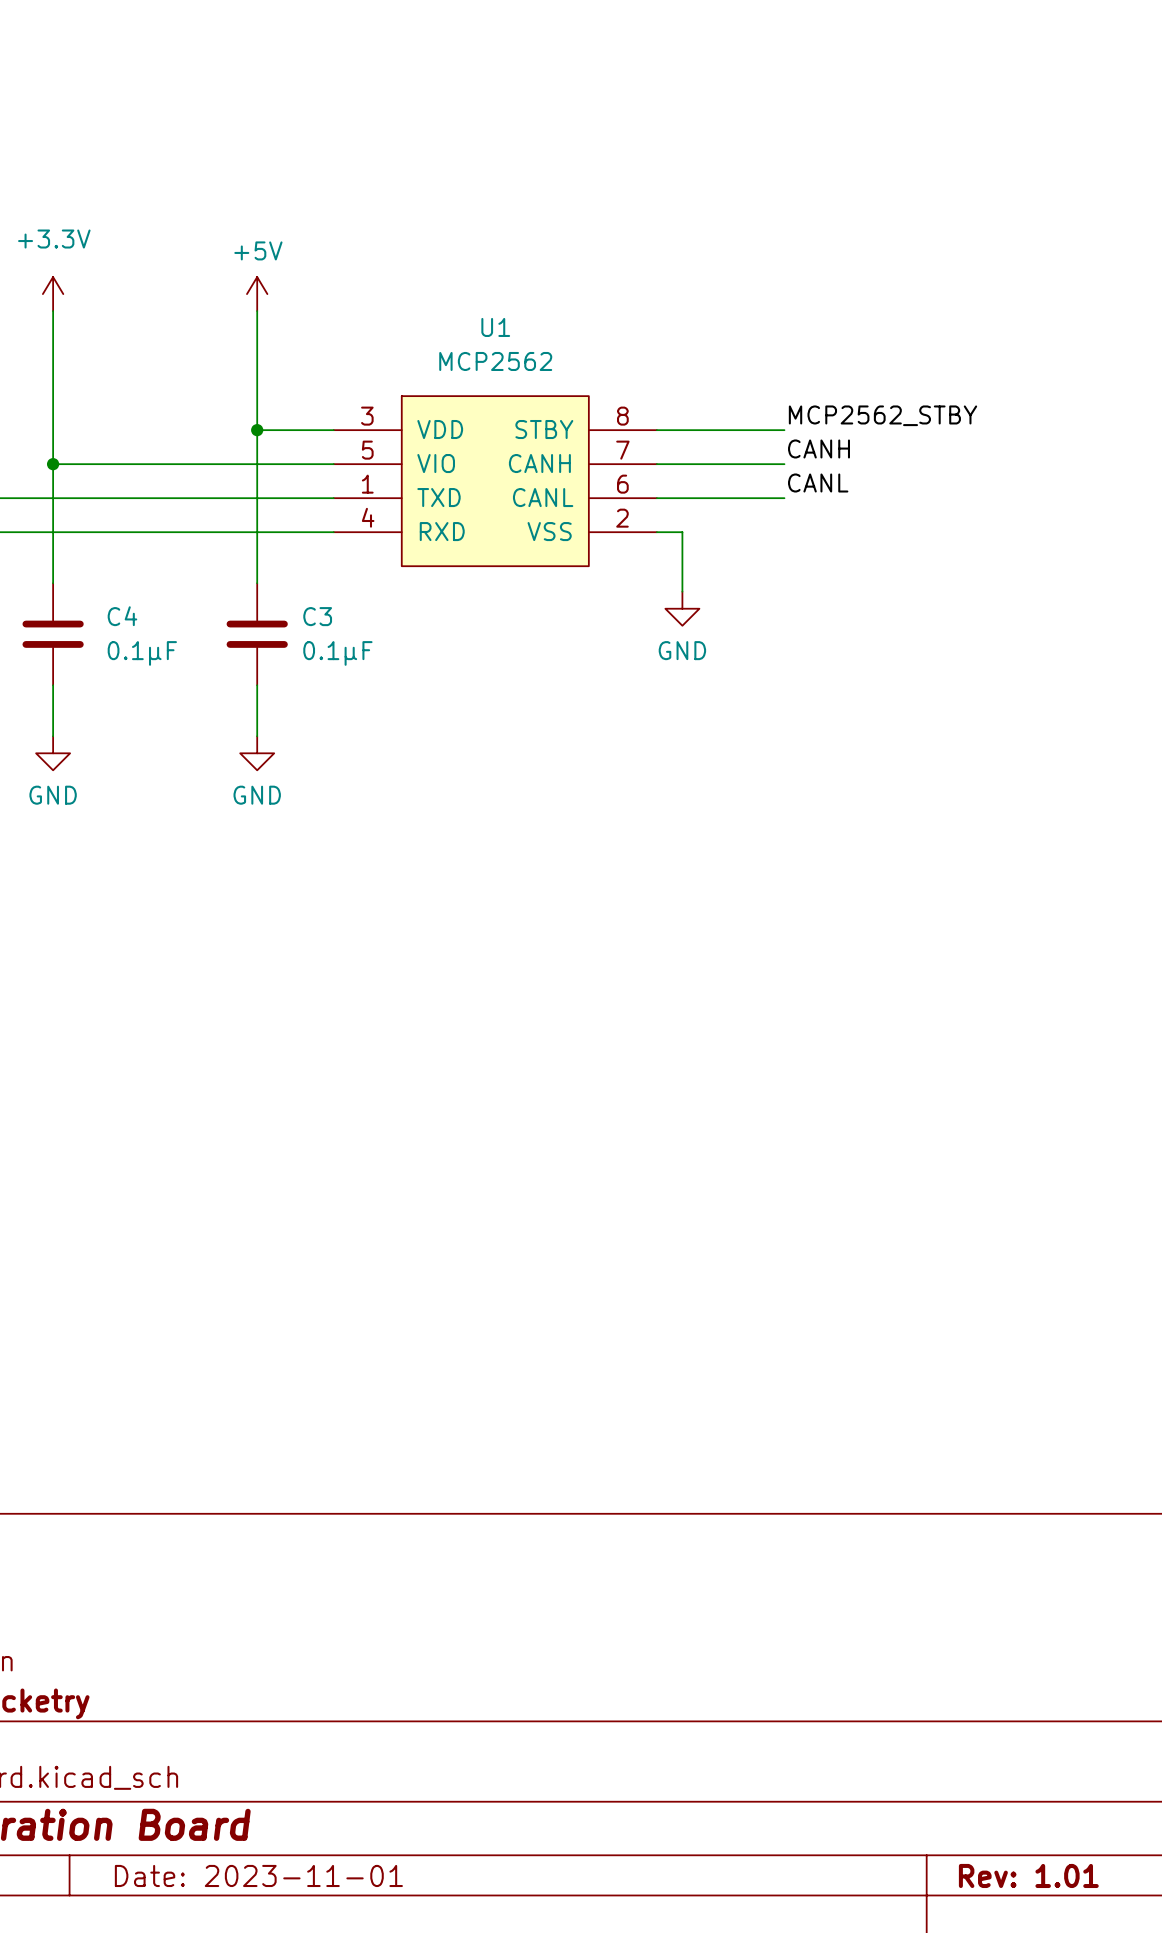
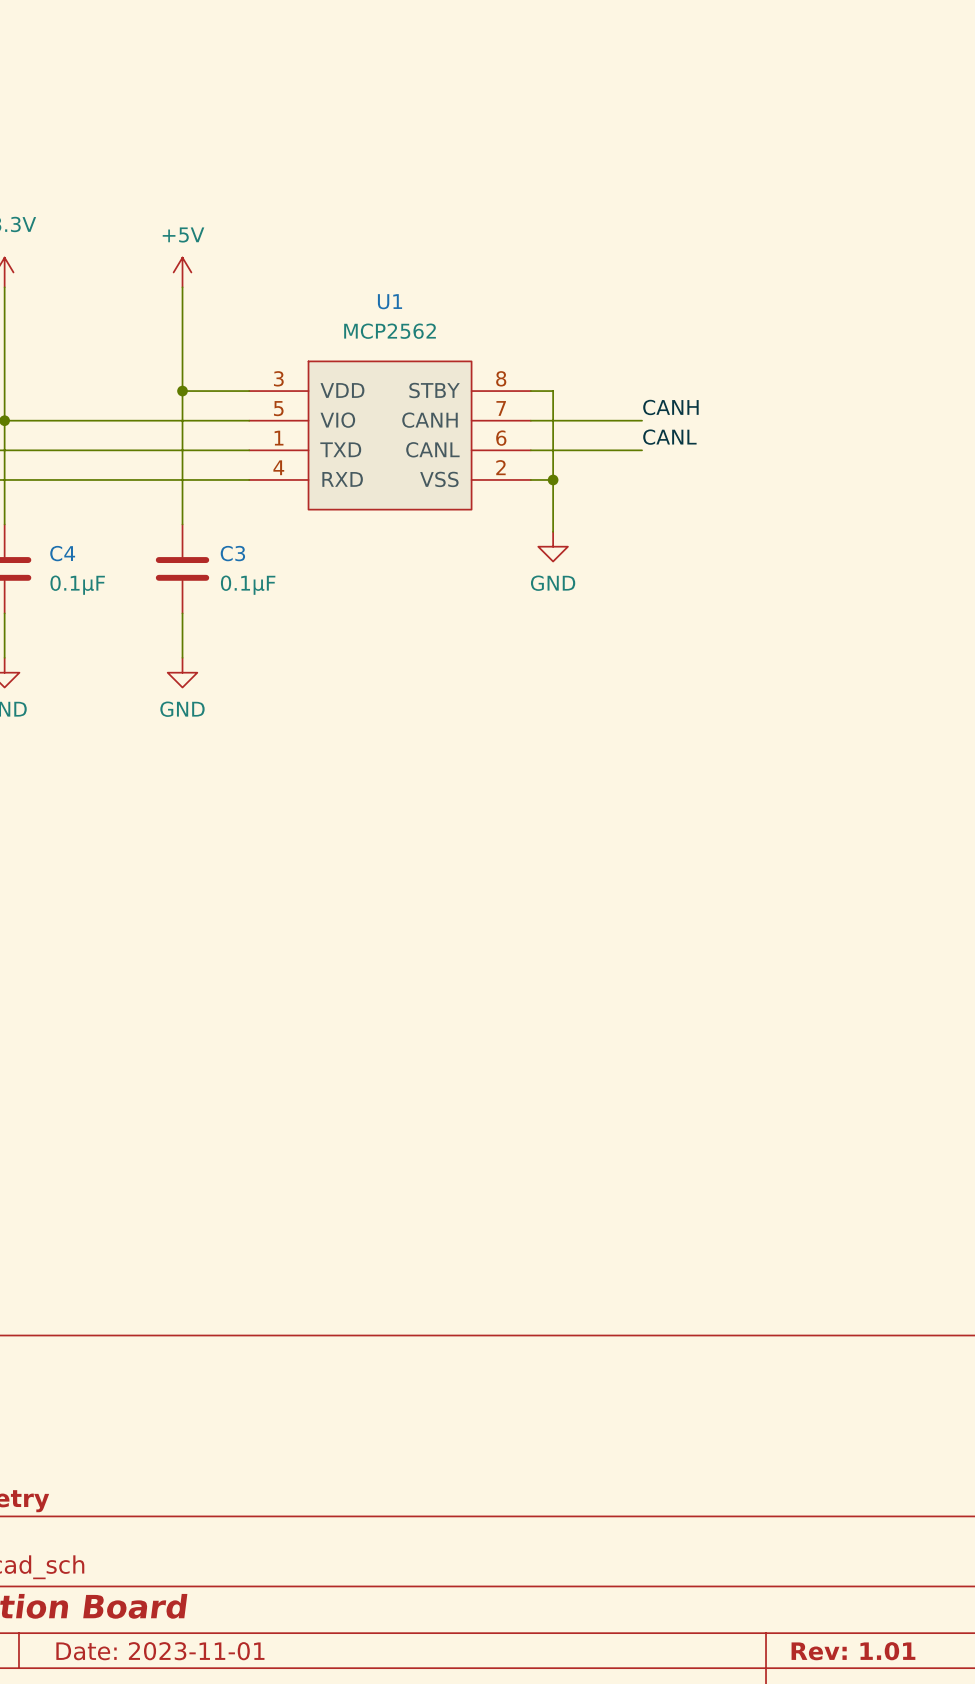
label: MCP2562_STBY (882, 415) -> none
wire: (682, 430) (784, 430) -> (553, 391) (553, 479)
junction: none -> (553, 479)

